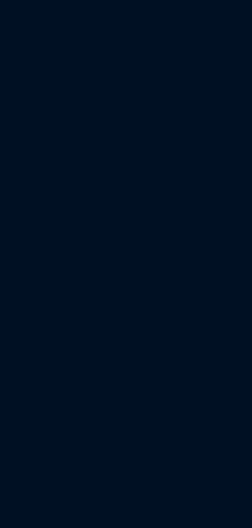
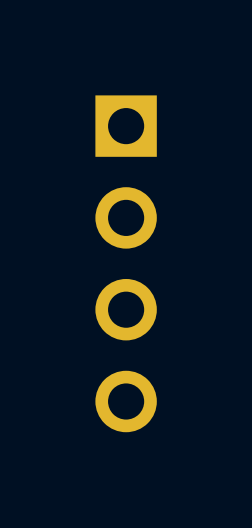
part: none -> (126, 263)

